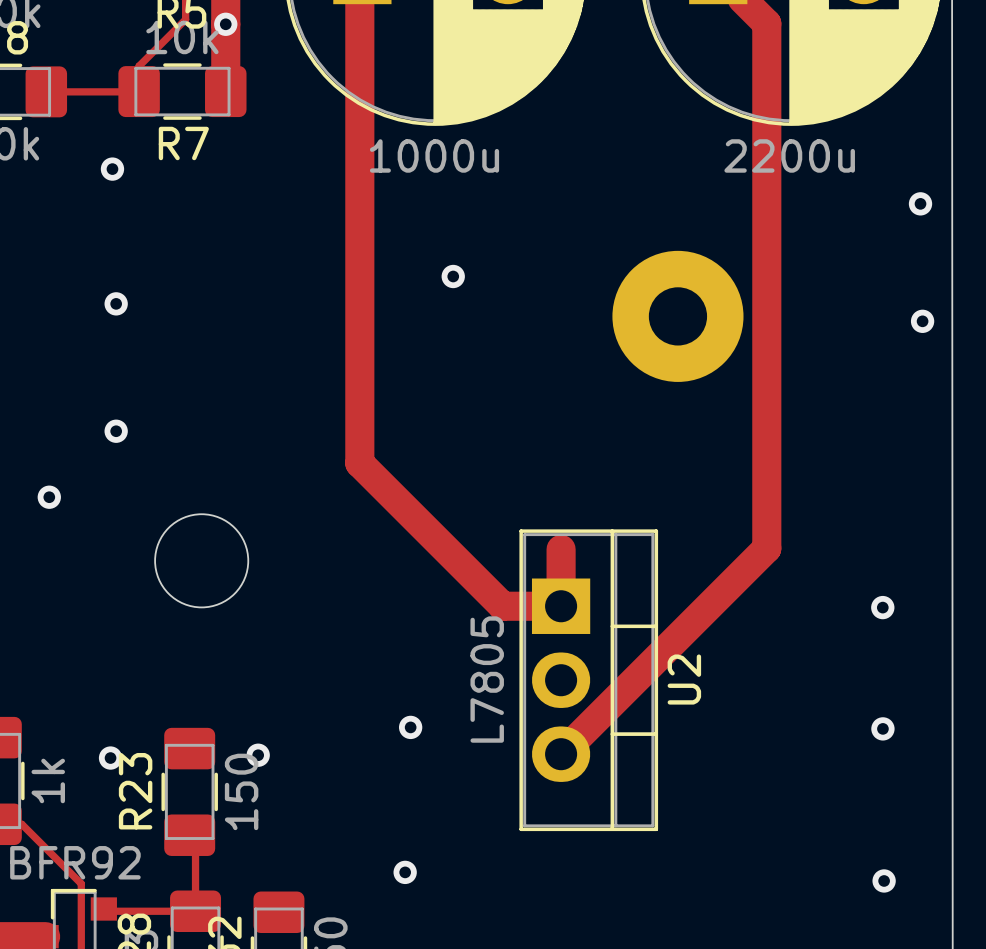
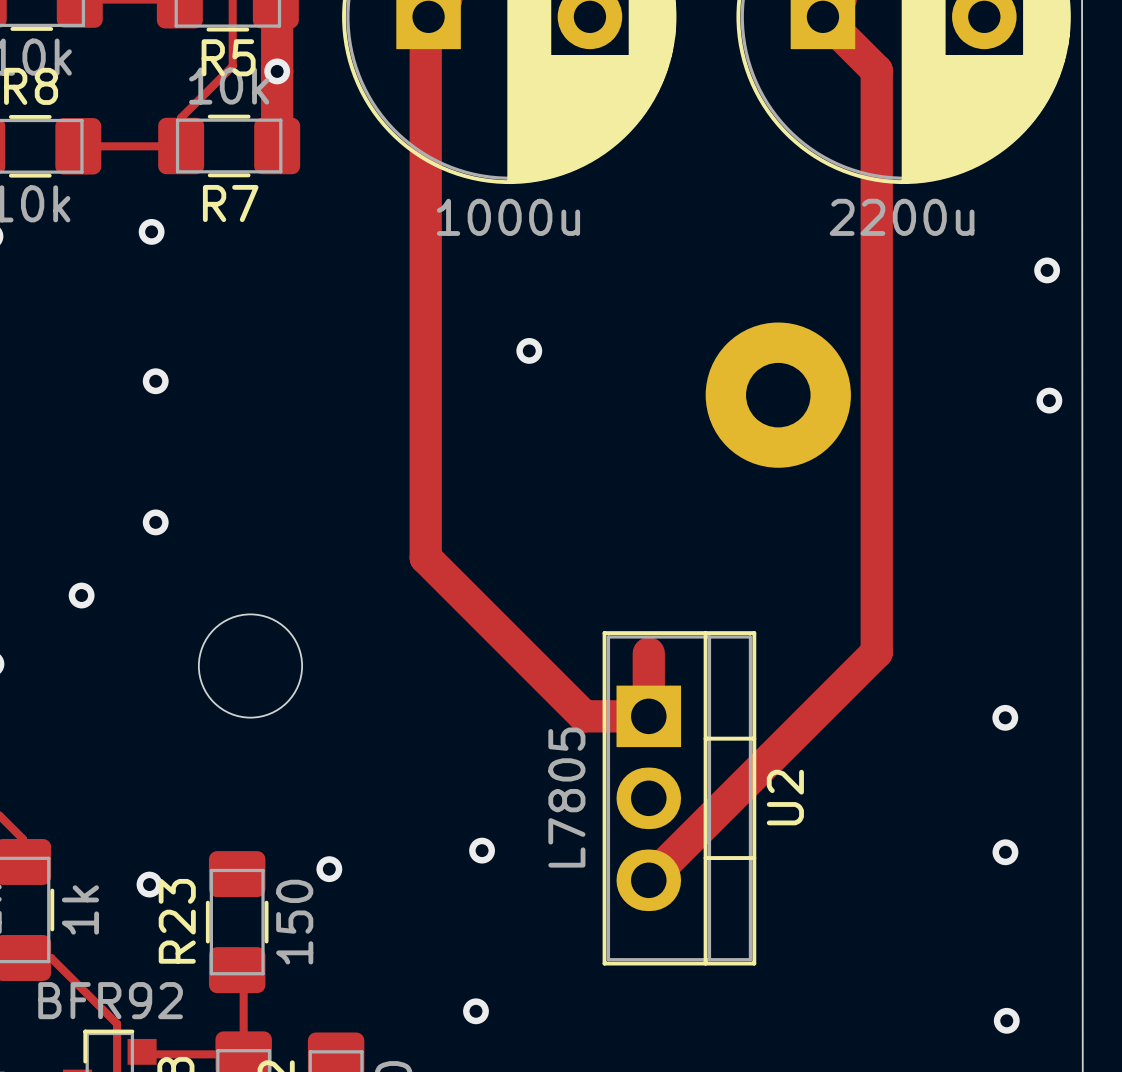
via position: (258, 755) -> (329, 869)

